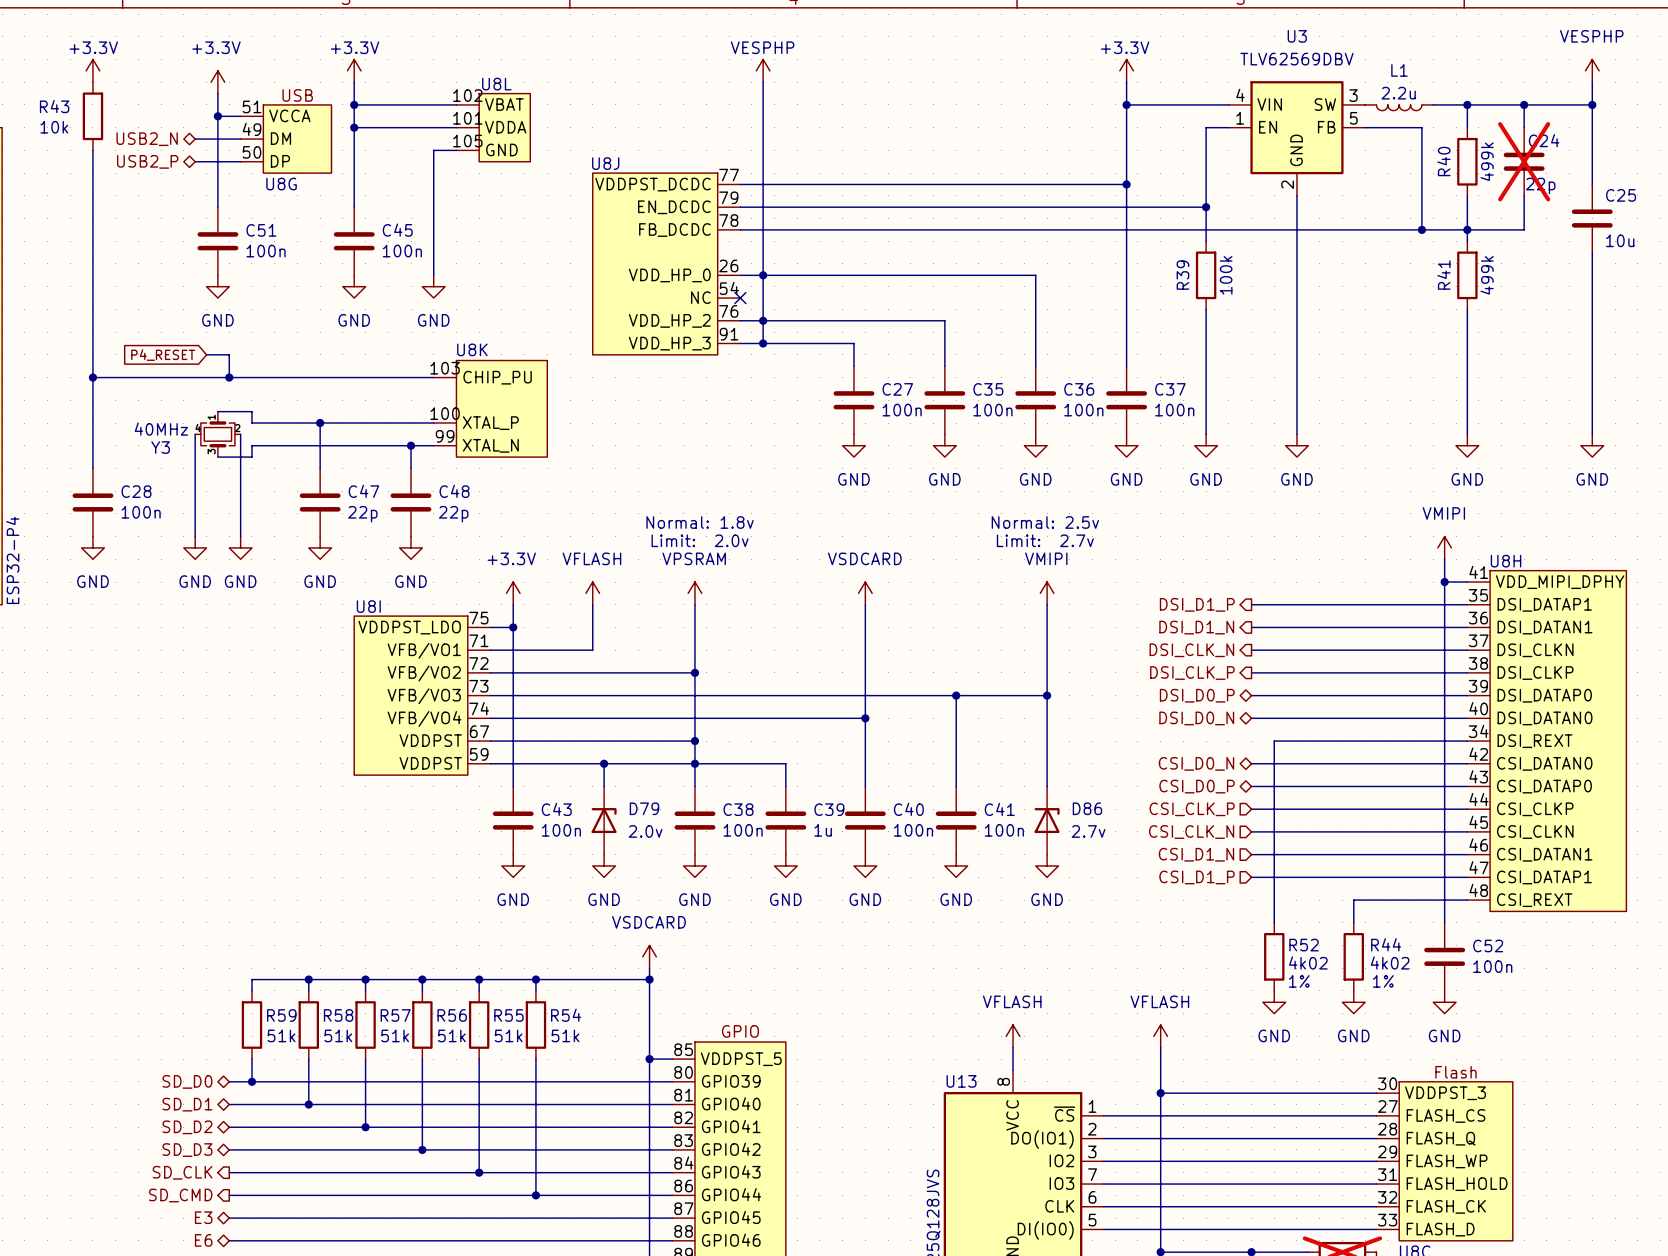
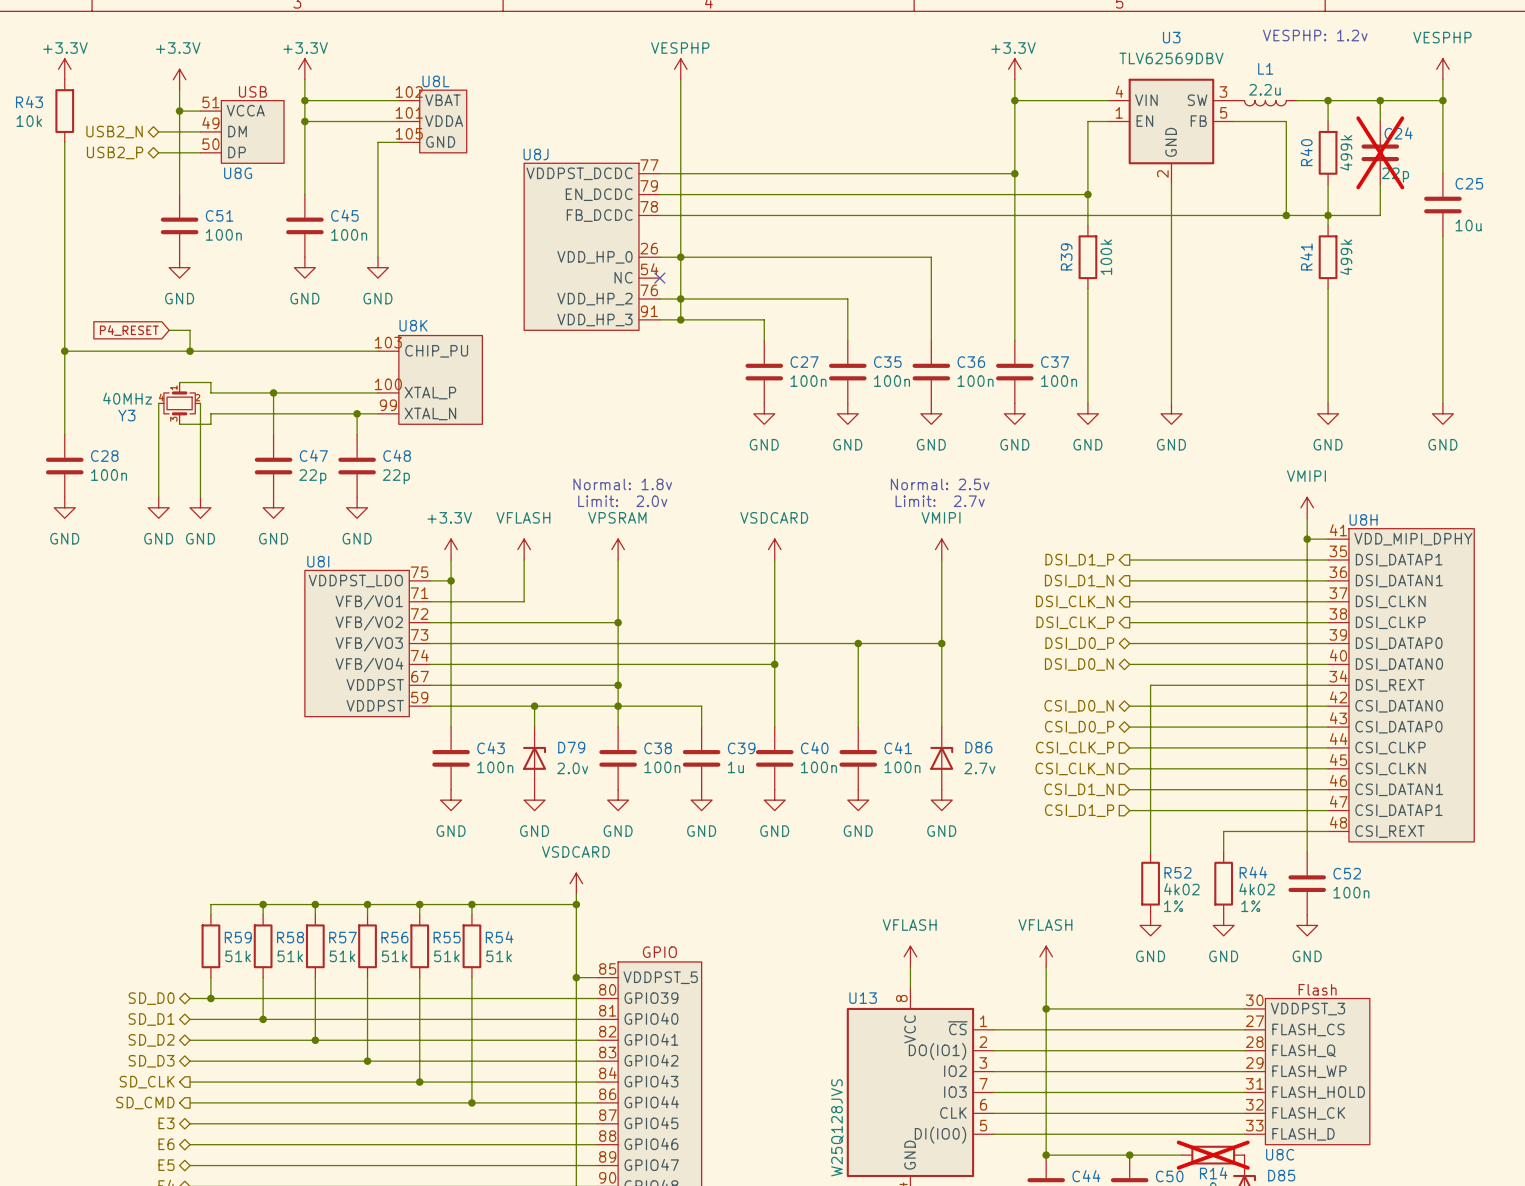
text: none -> VESPHP: 1.2v (1315, 35)

